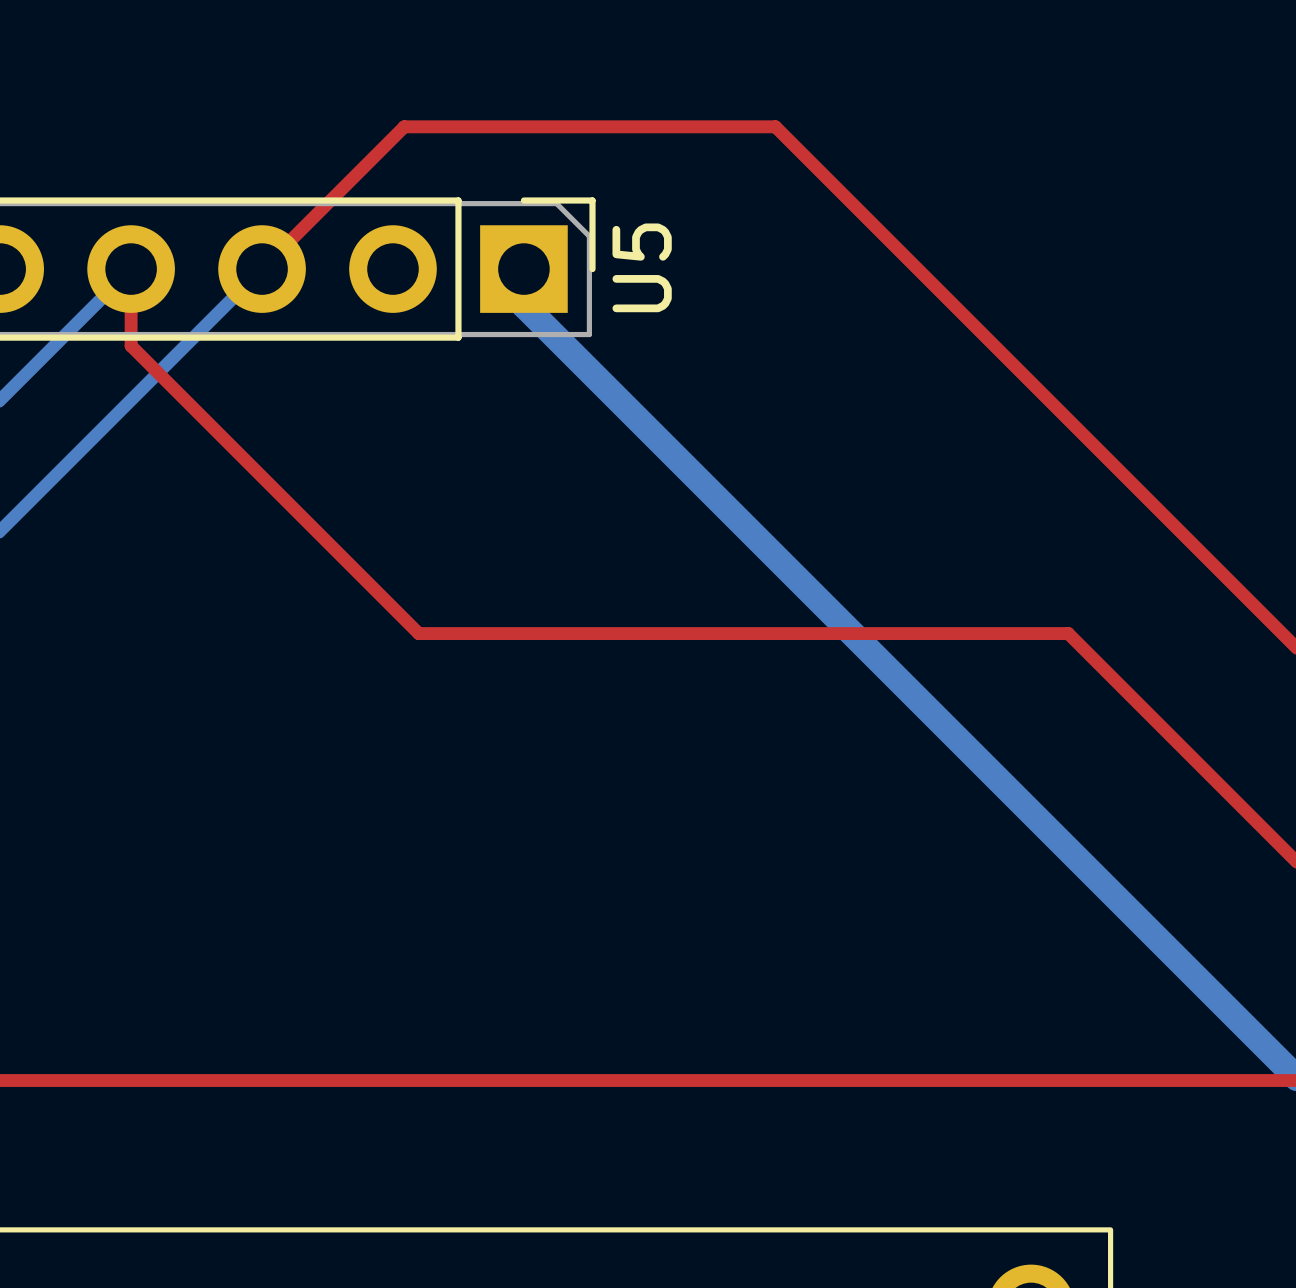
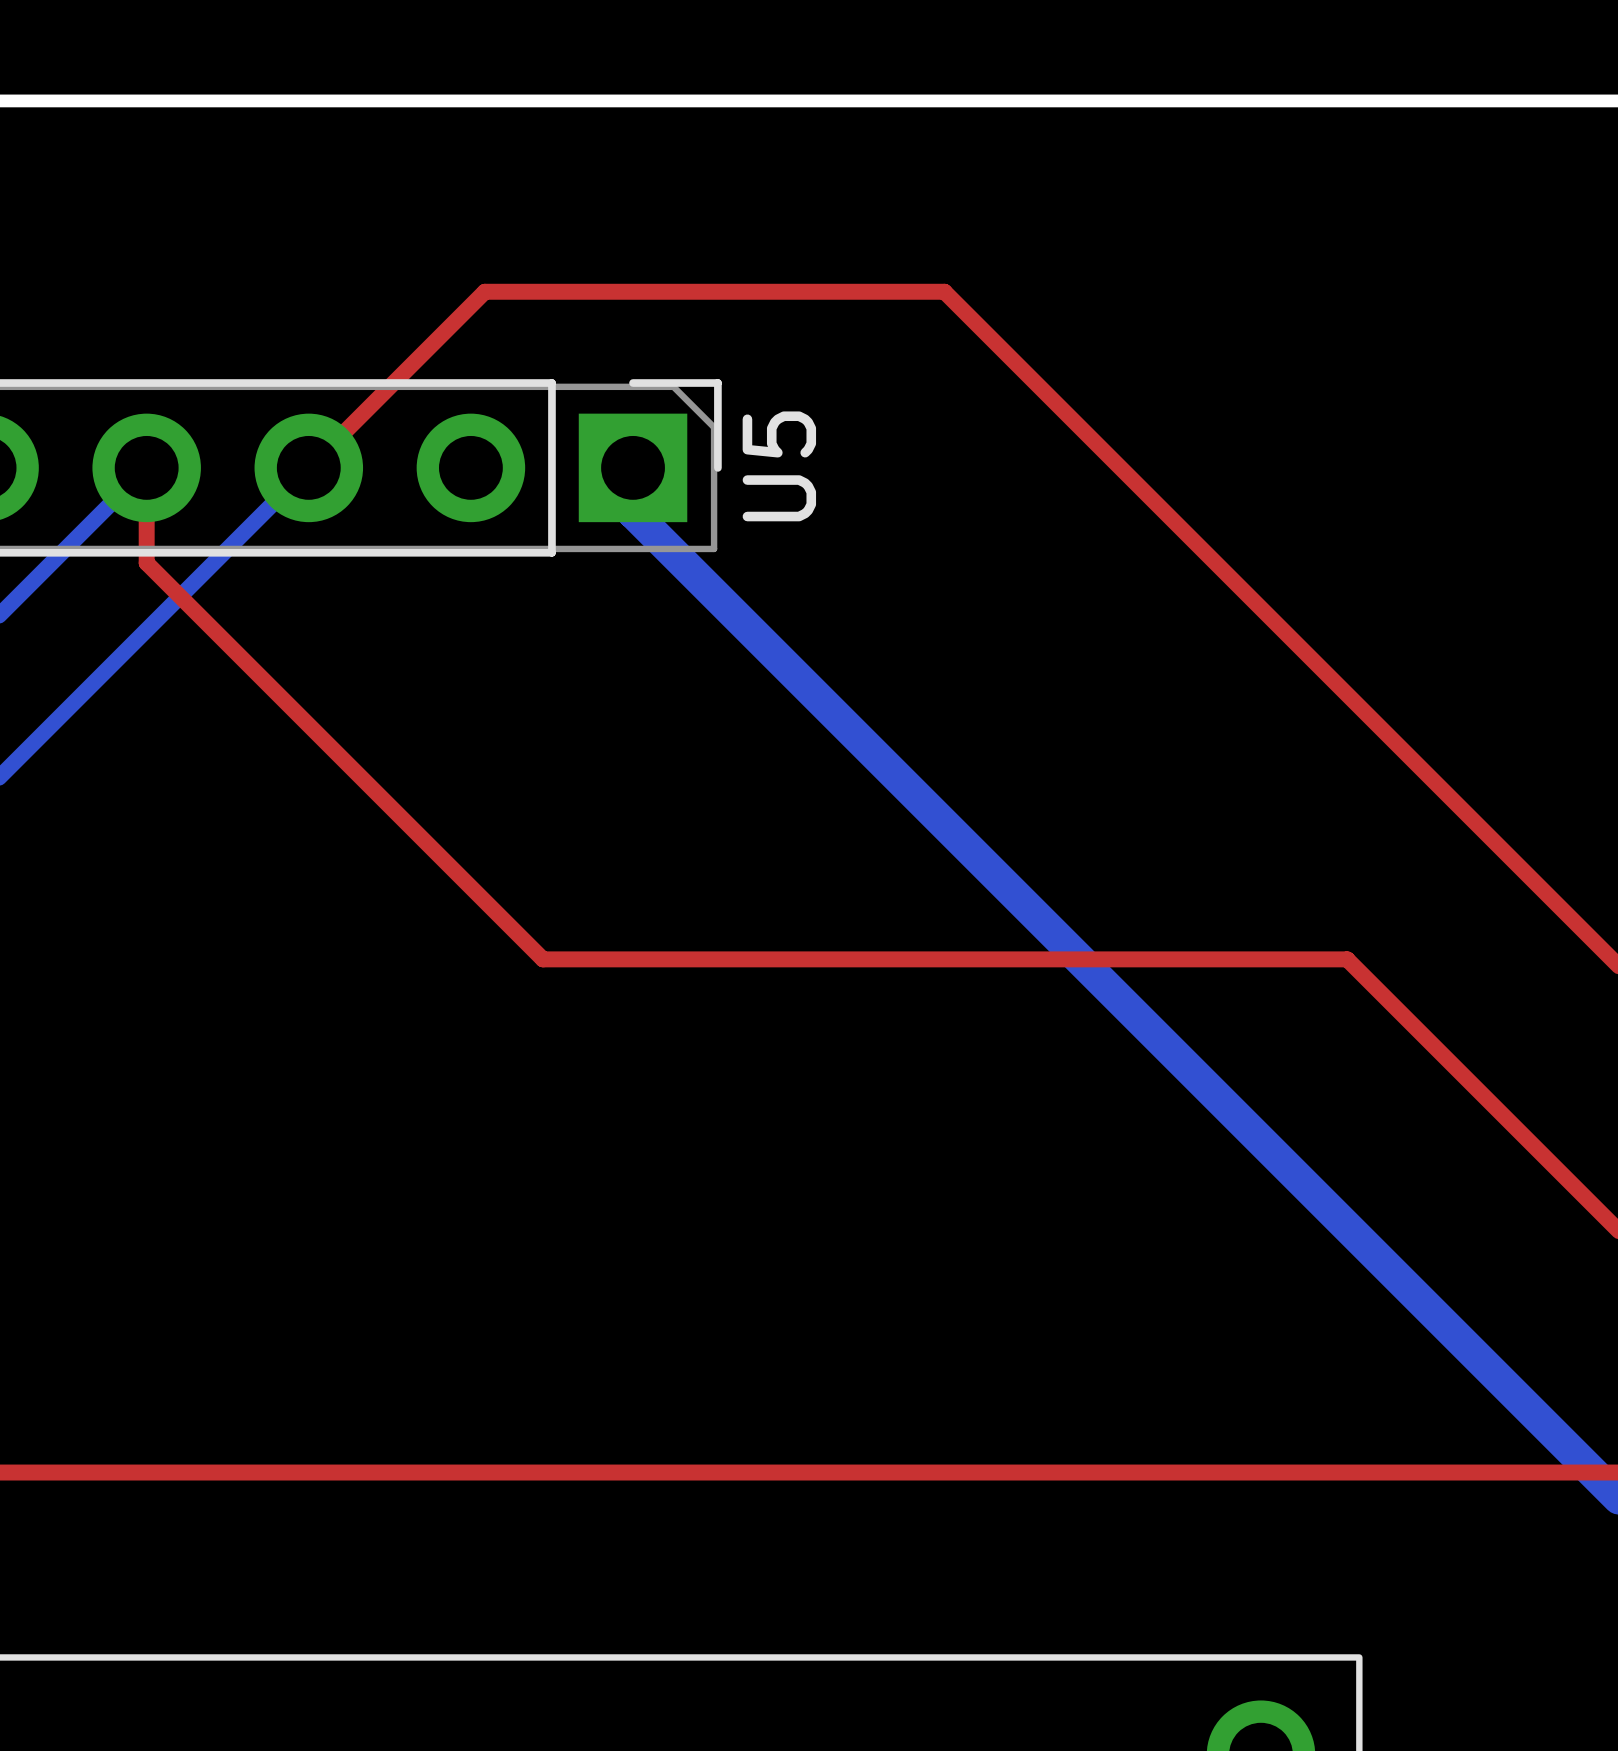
top track: (418, 633) (1068, 633) (1100, 666) -> (502, 919) (543, 959) (1347, 959)

